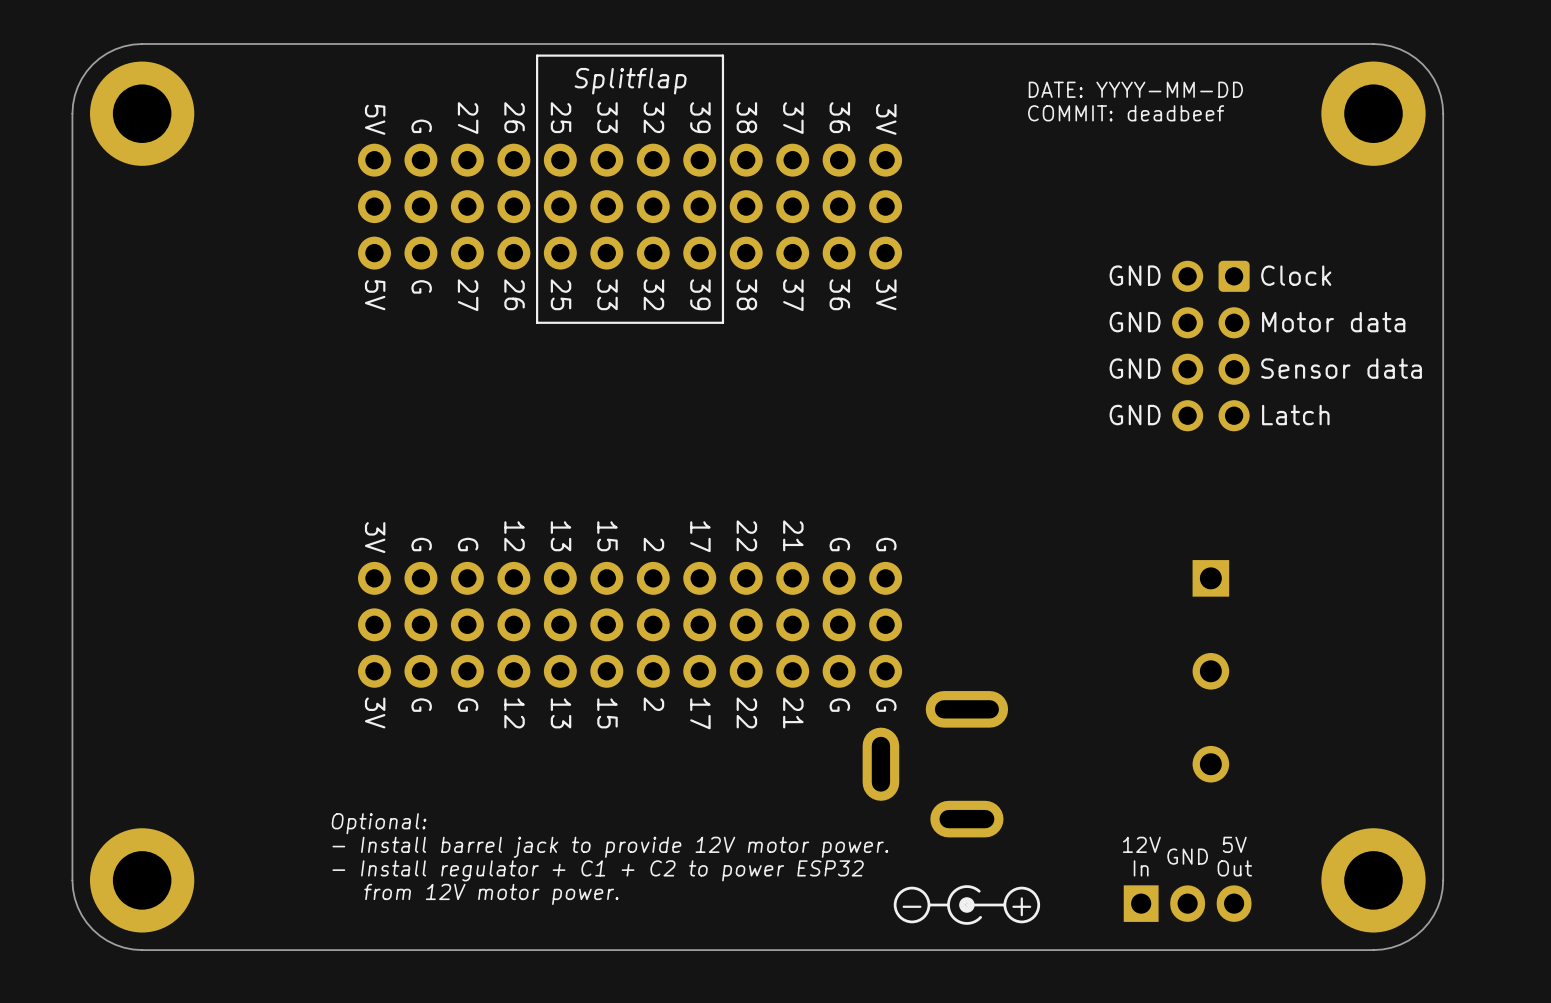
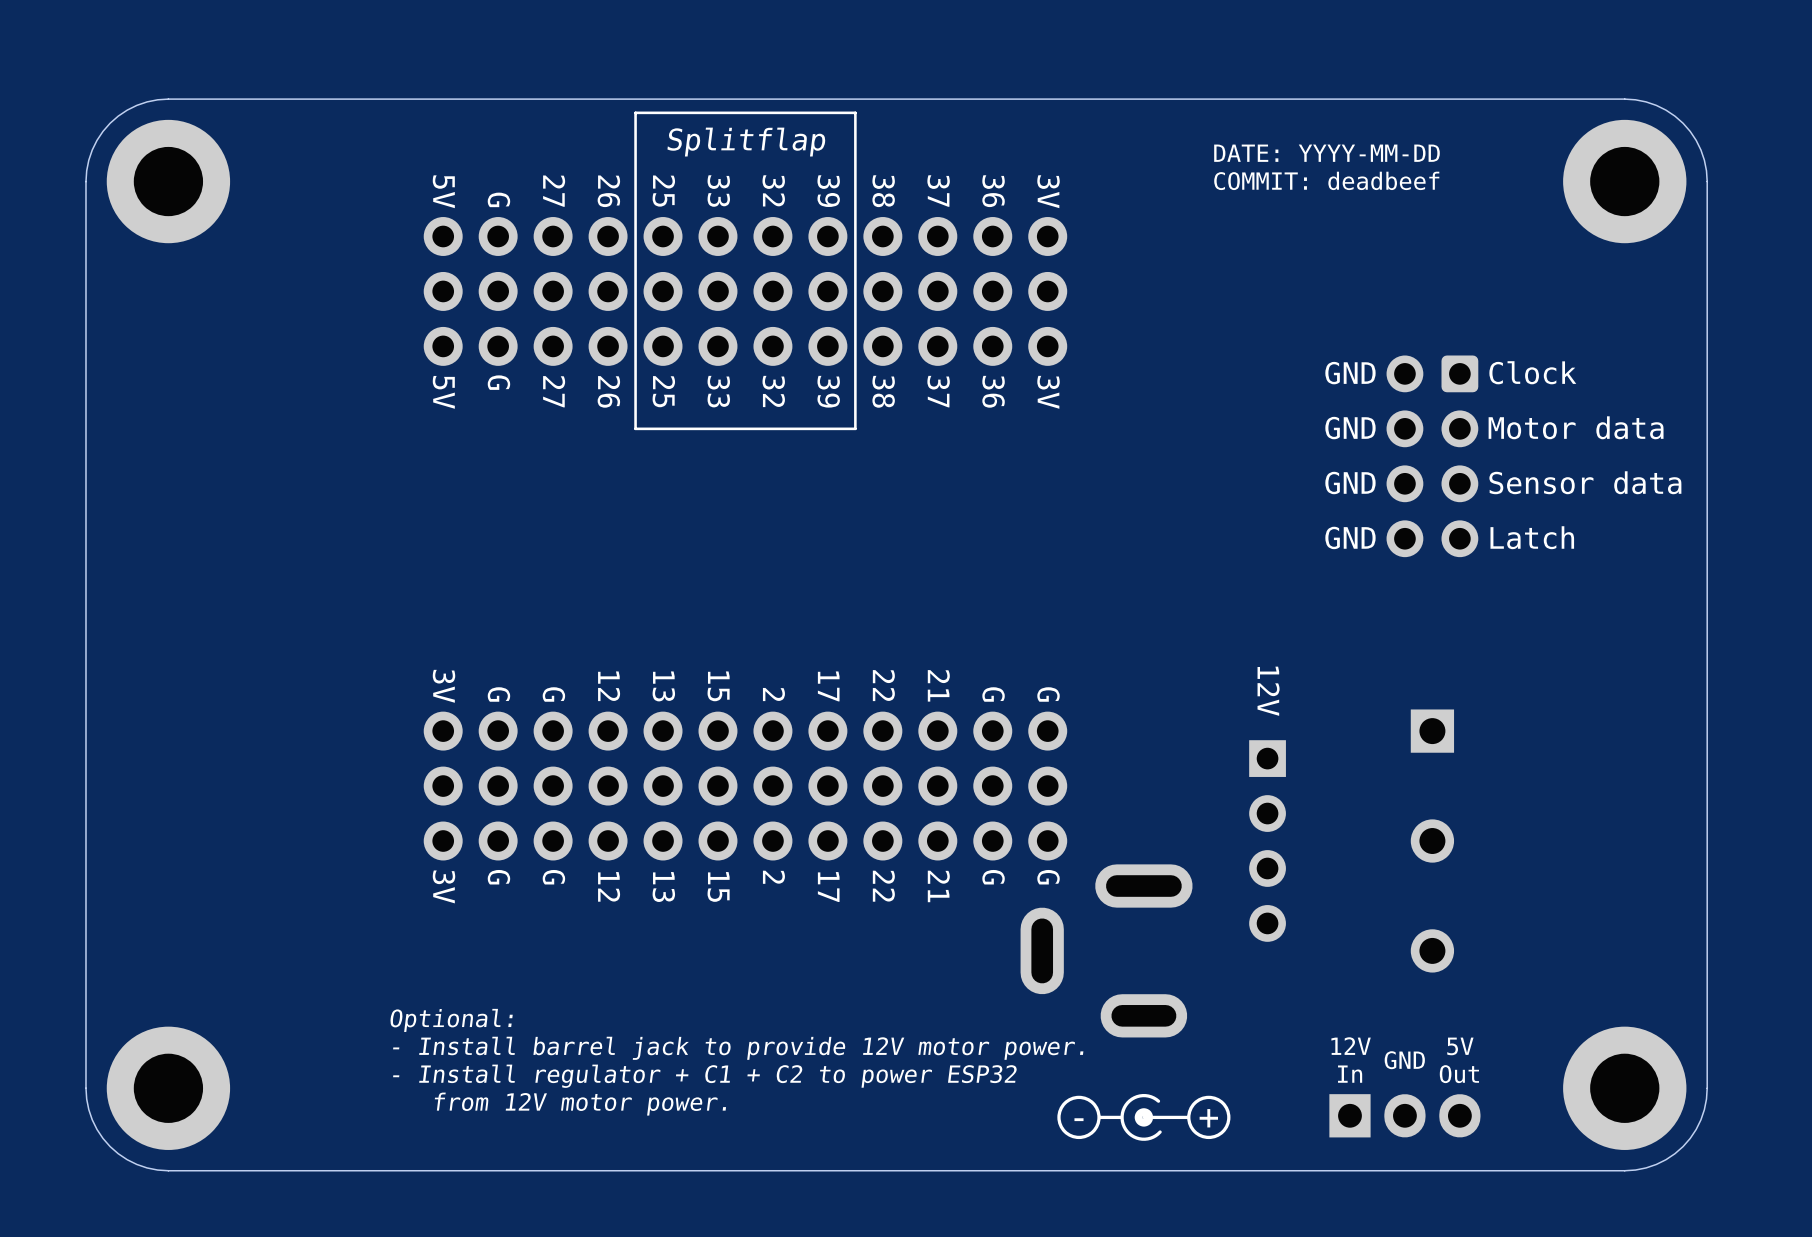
text: none -> 12V (1268, 691)
part: none -> (1267, 841)

